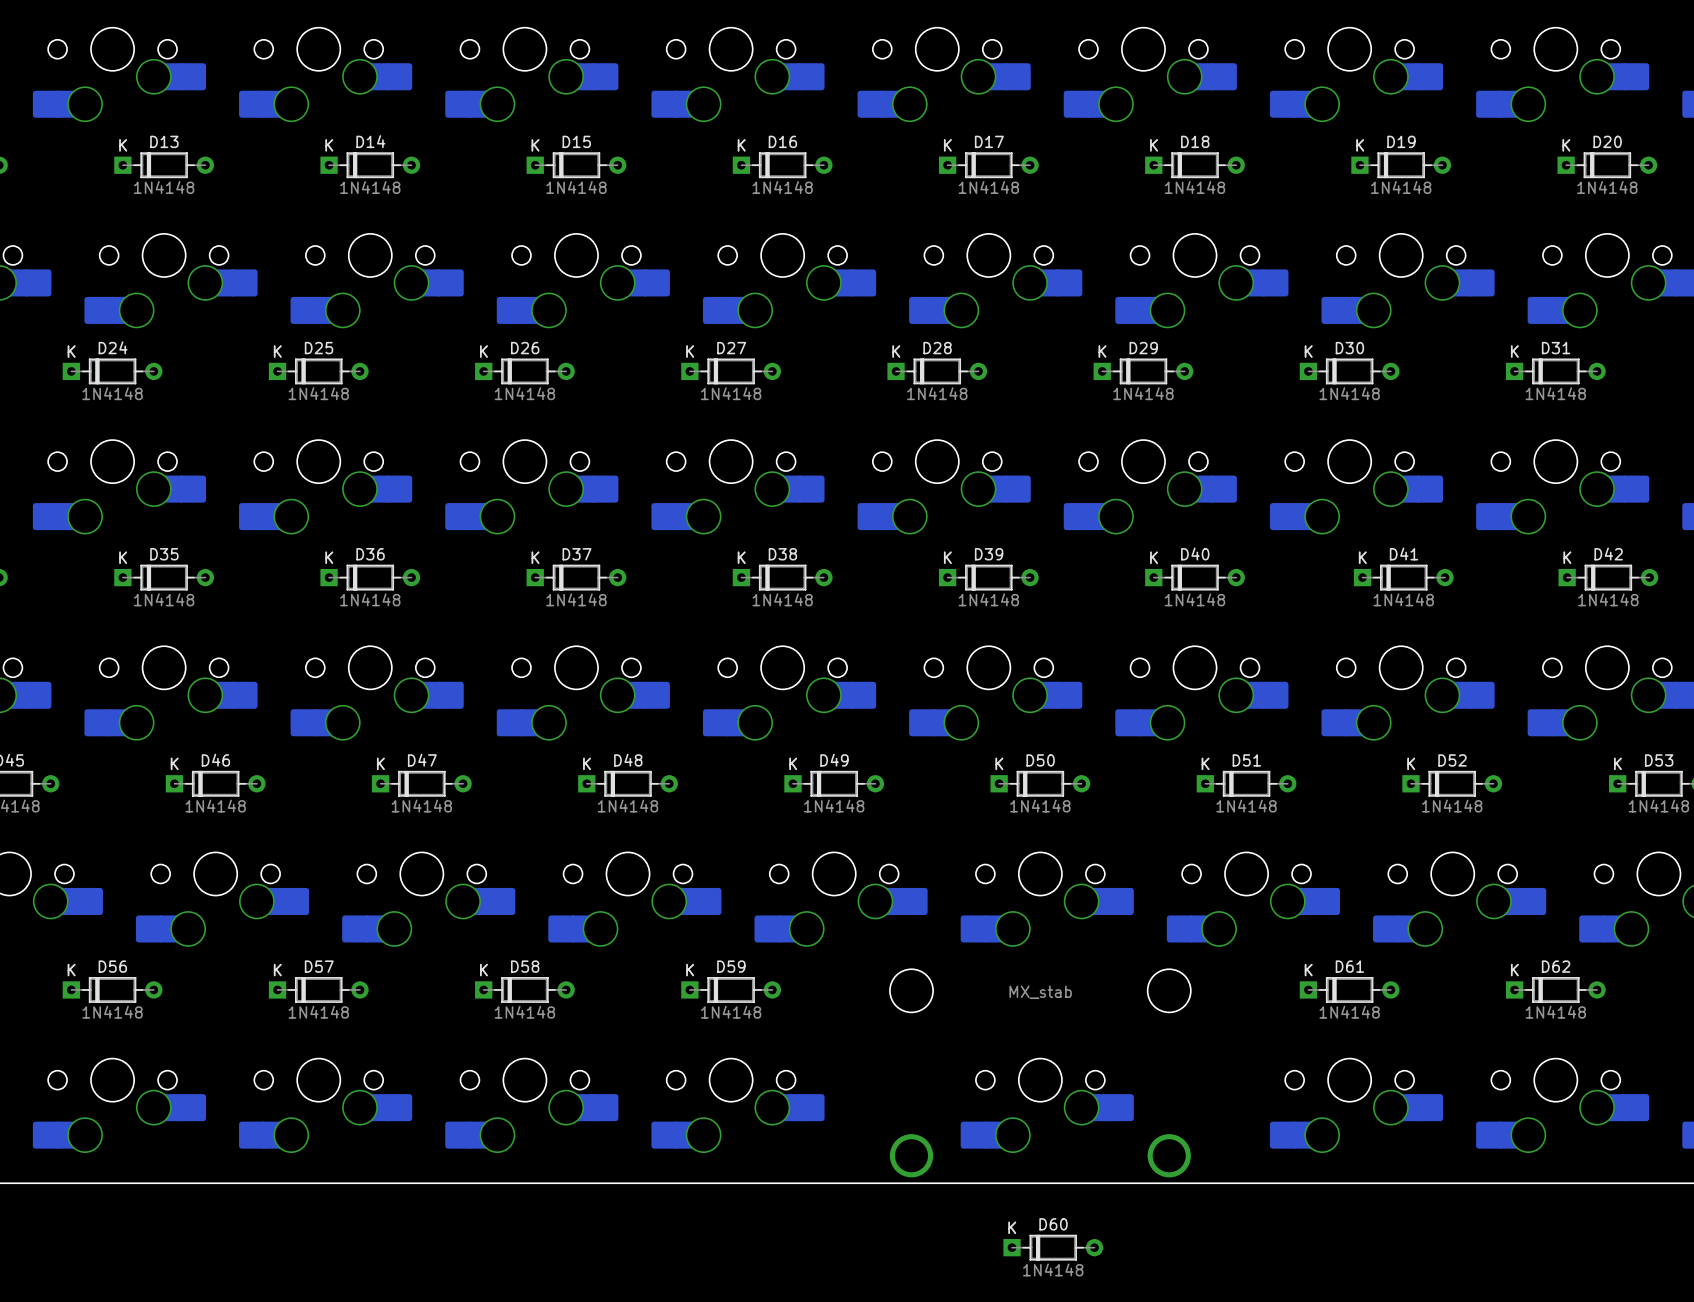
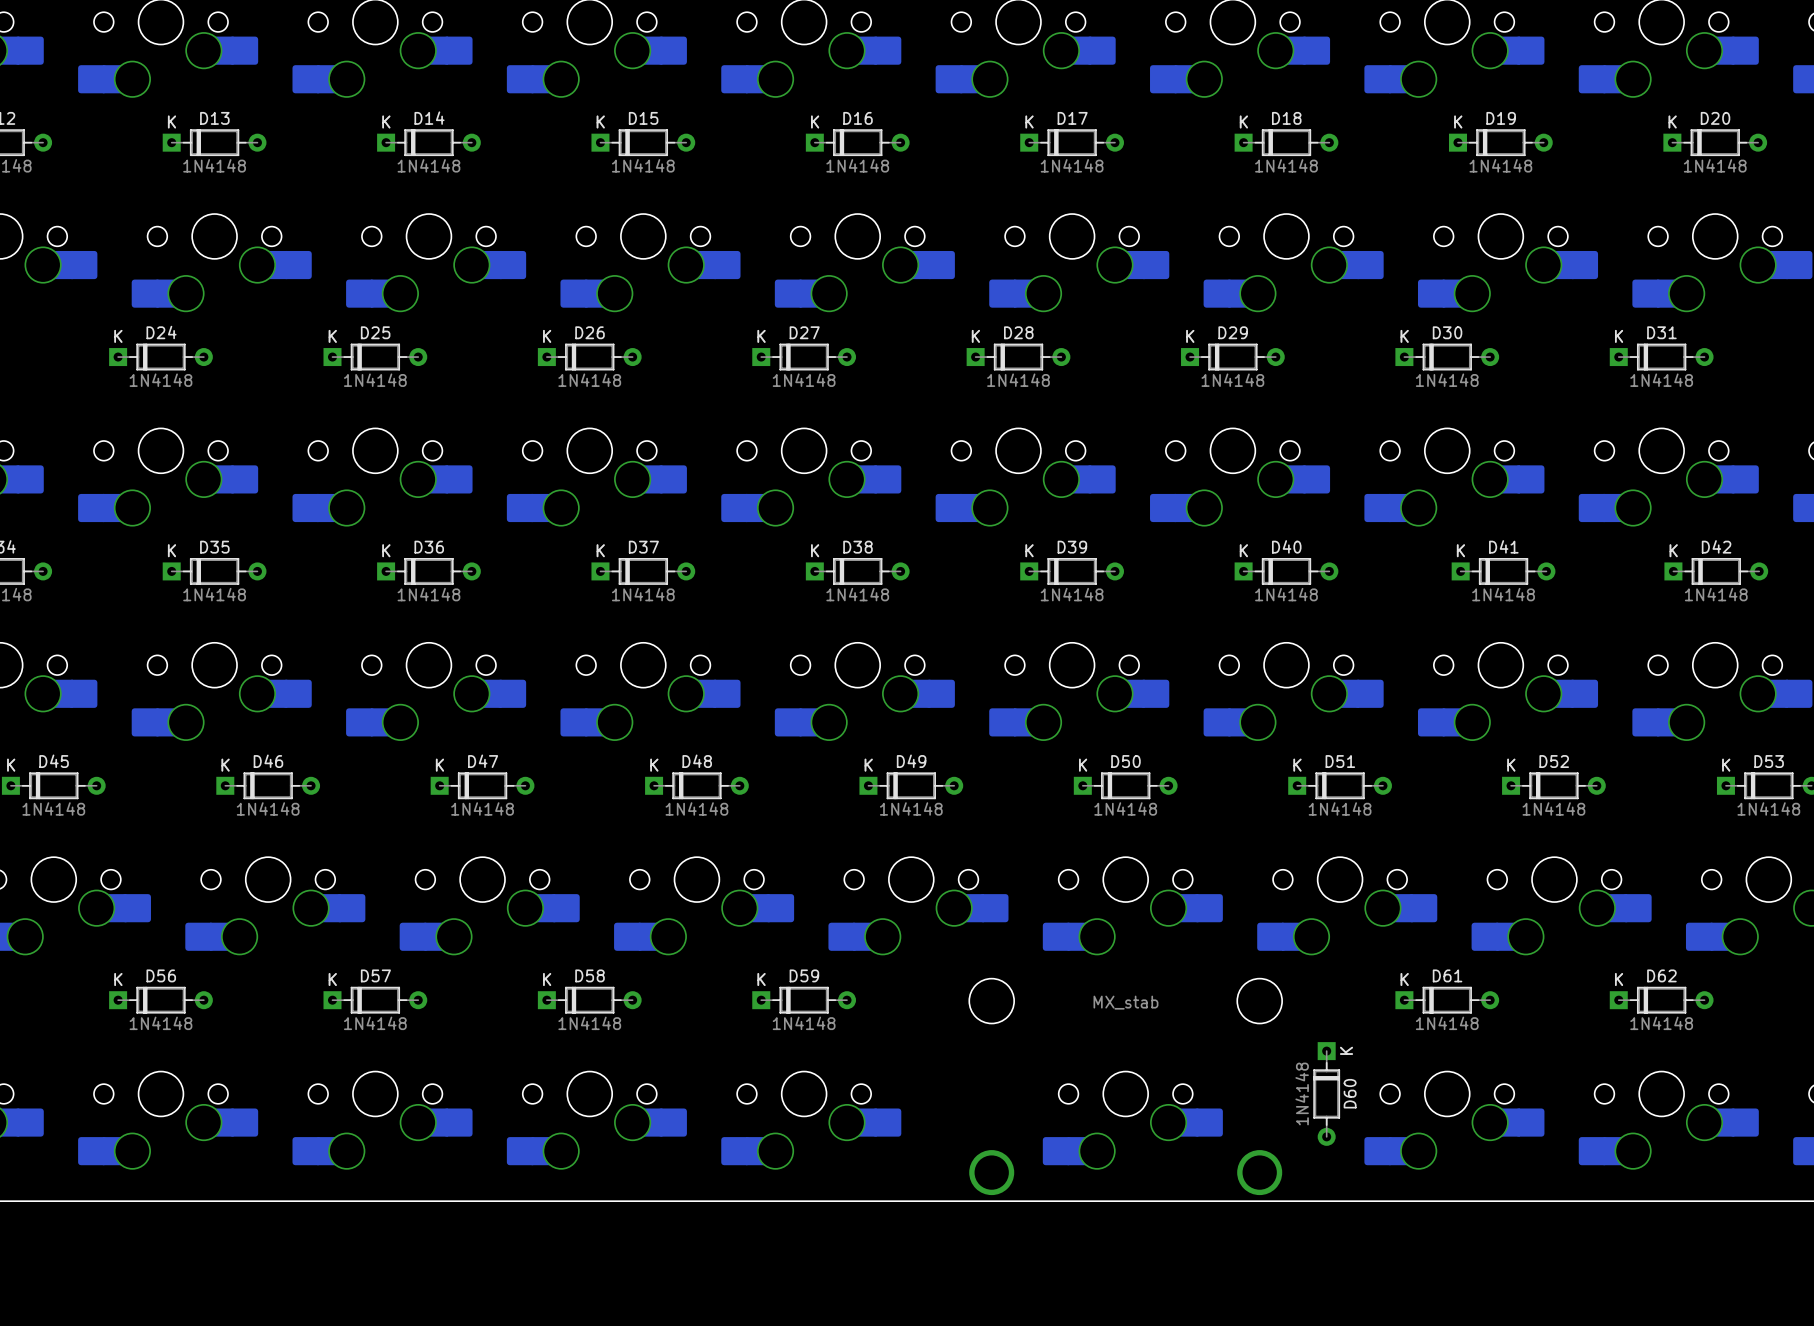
D60 rotation: 0° (1053, 1247) -> 90° clockwise (1326, 1093)
D60 position: (1053, 1247) -> (1326, 1093)

